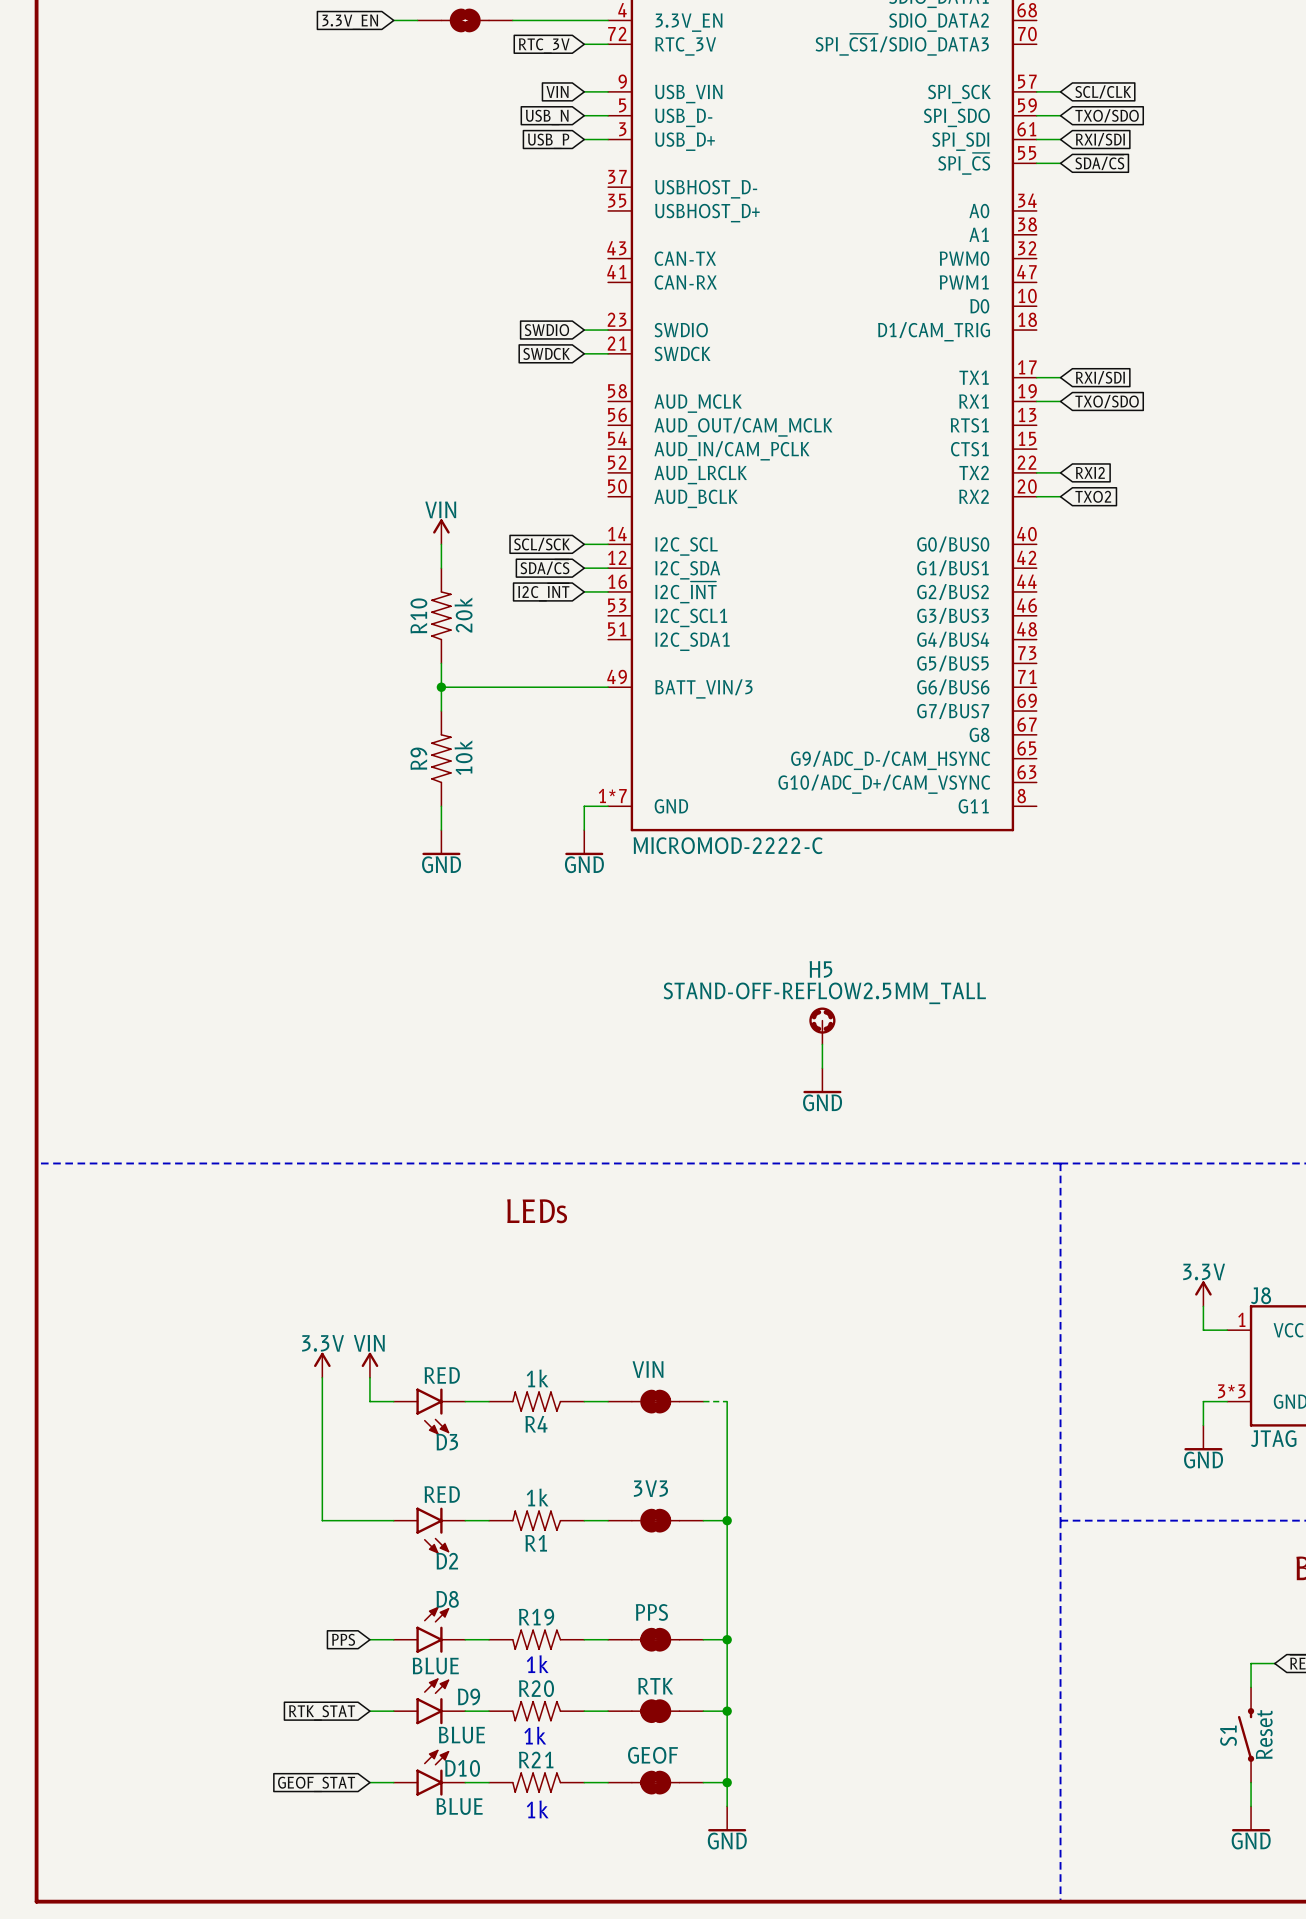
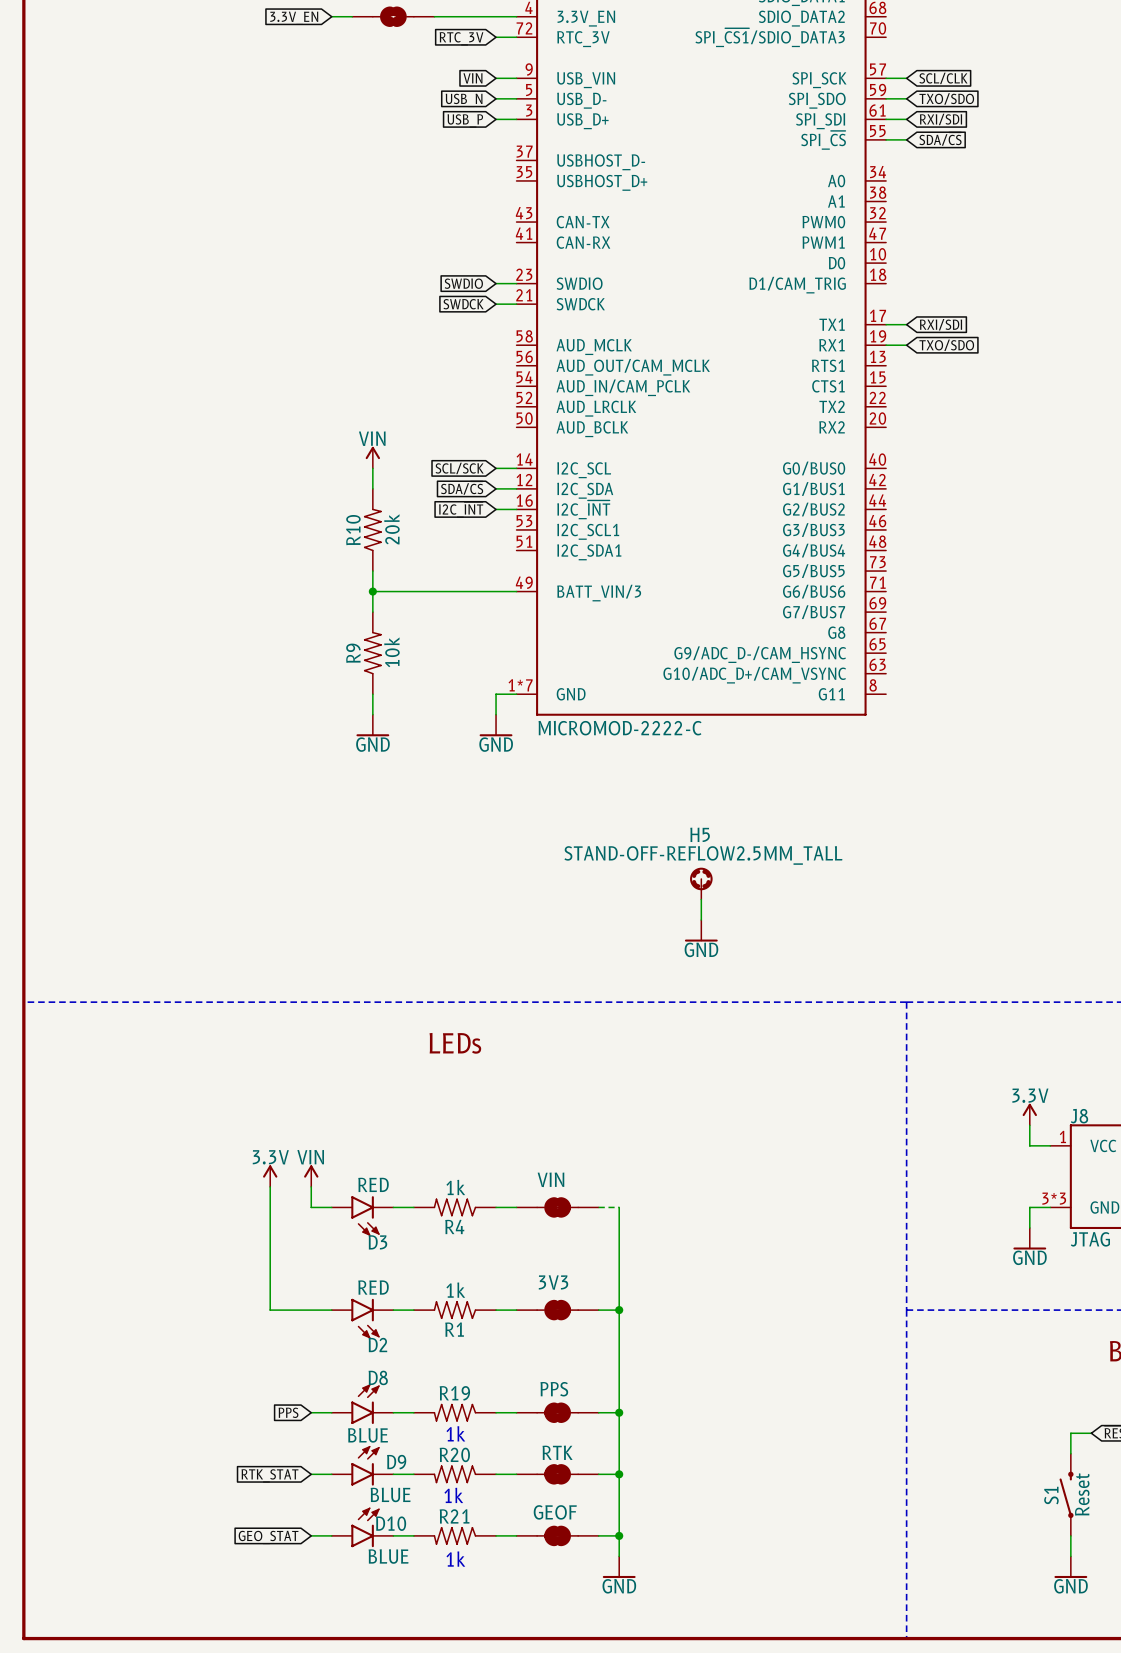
wire: (1036, 472) (1060, 472) -> none
global label: RXI2 (1090, 472) -> none
wire: (1036, 496) (1060, 496) -> none
global label: TXO2 (1093, 496) -> none
global label: GEOF_STAT (316, 1784) -> GEO_STAT (268, 1537)

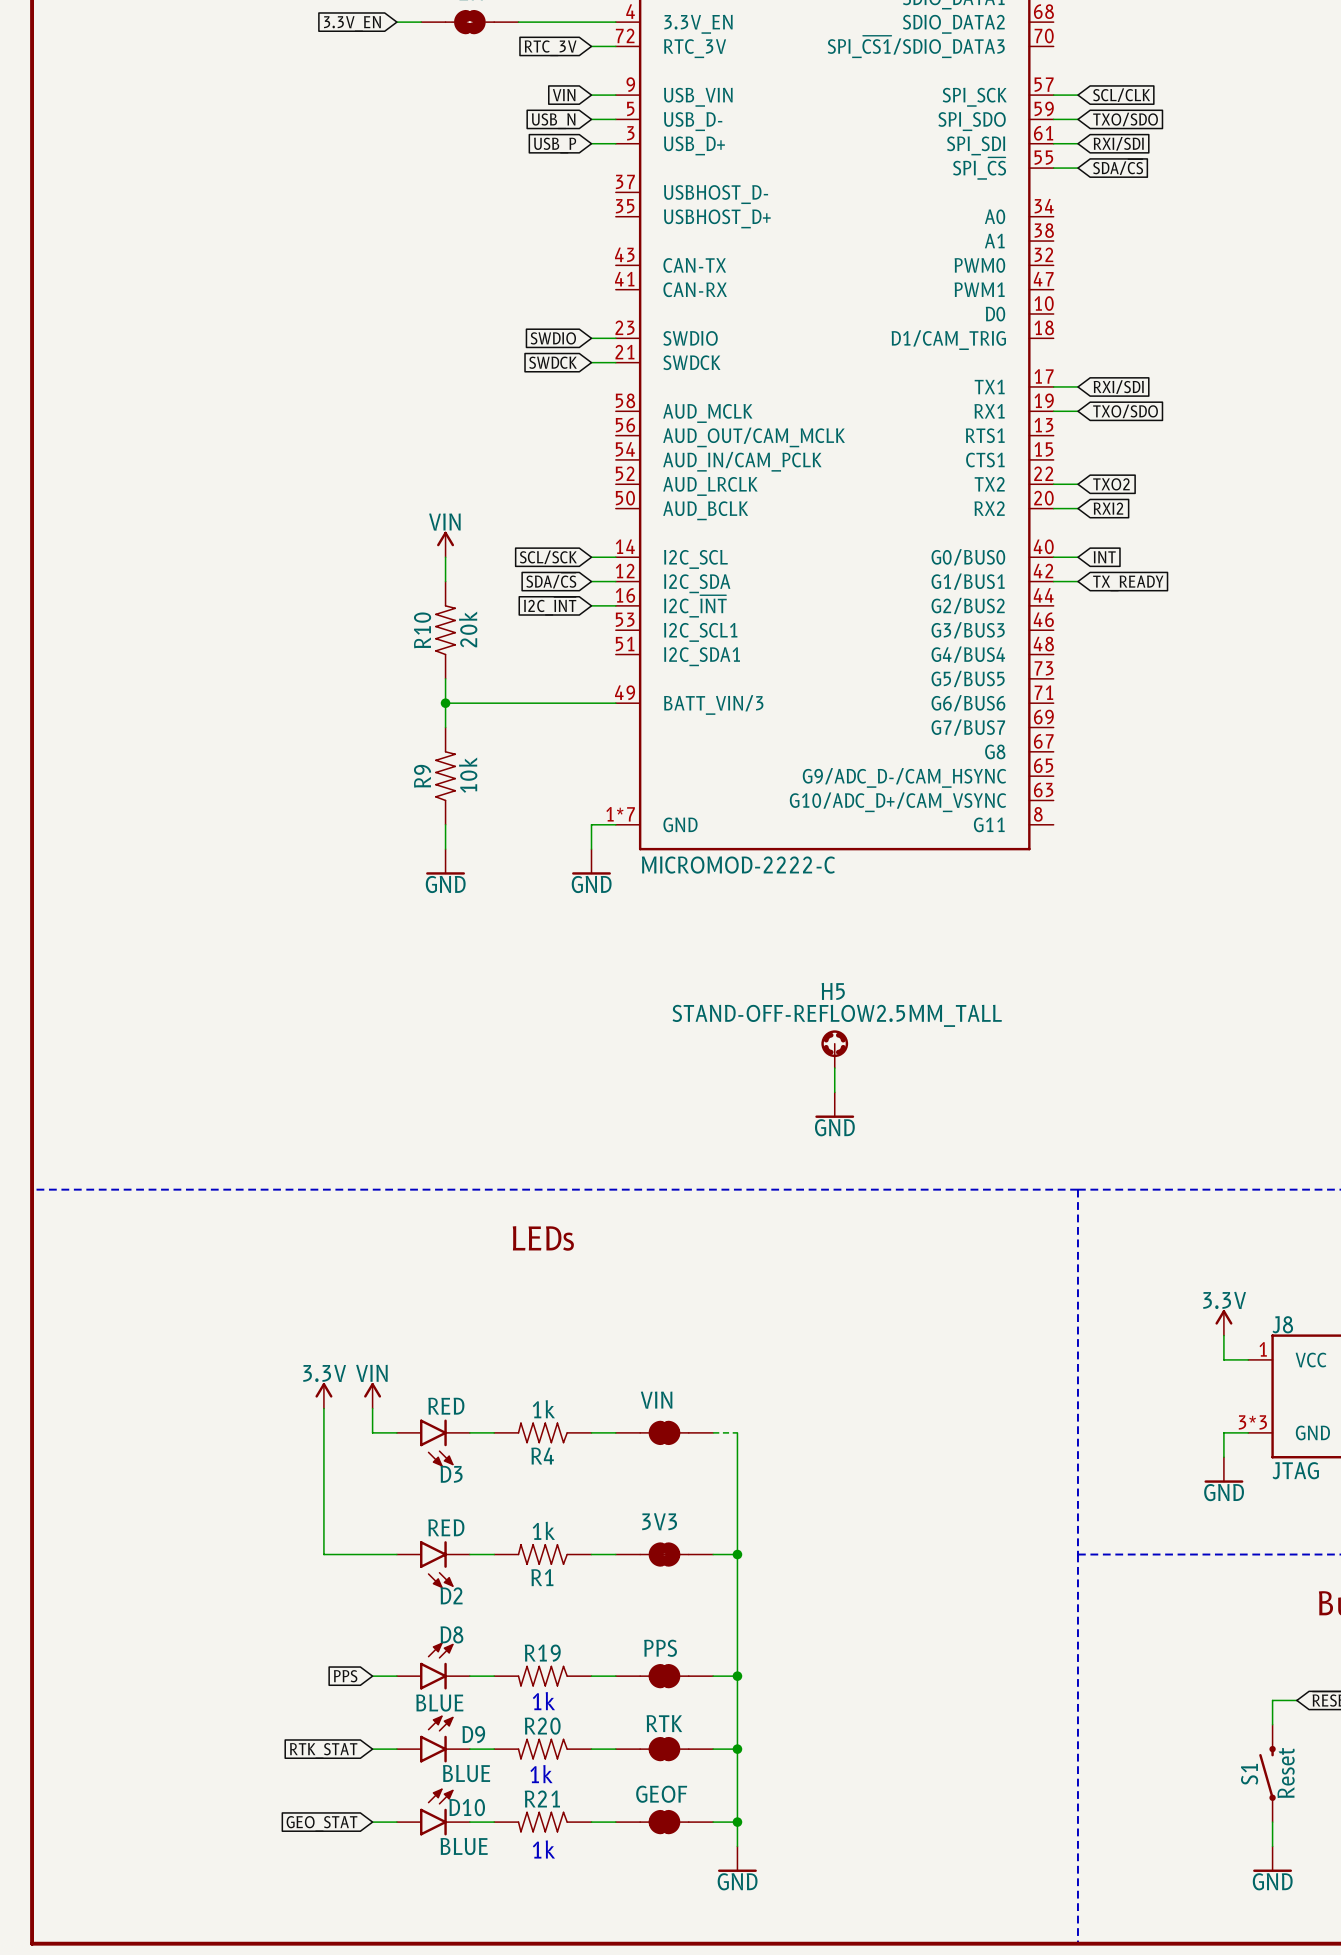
wire: none -> (1053, 484) (1077, 484)
global label: none -> TXO2 (1111, 484)
wire: none -> (1053, 508) (1077, 508)
global label: none -> RXI2 (1108, 508)
wire: none -> (1053, 557) (1077, 557)
global label: none -> INT (1104, 557)
wire: none -> (1053, 581) (1077, 581)
global label: none -> TX_READY (1128, 583)

